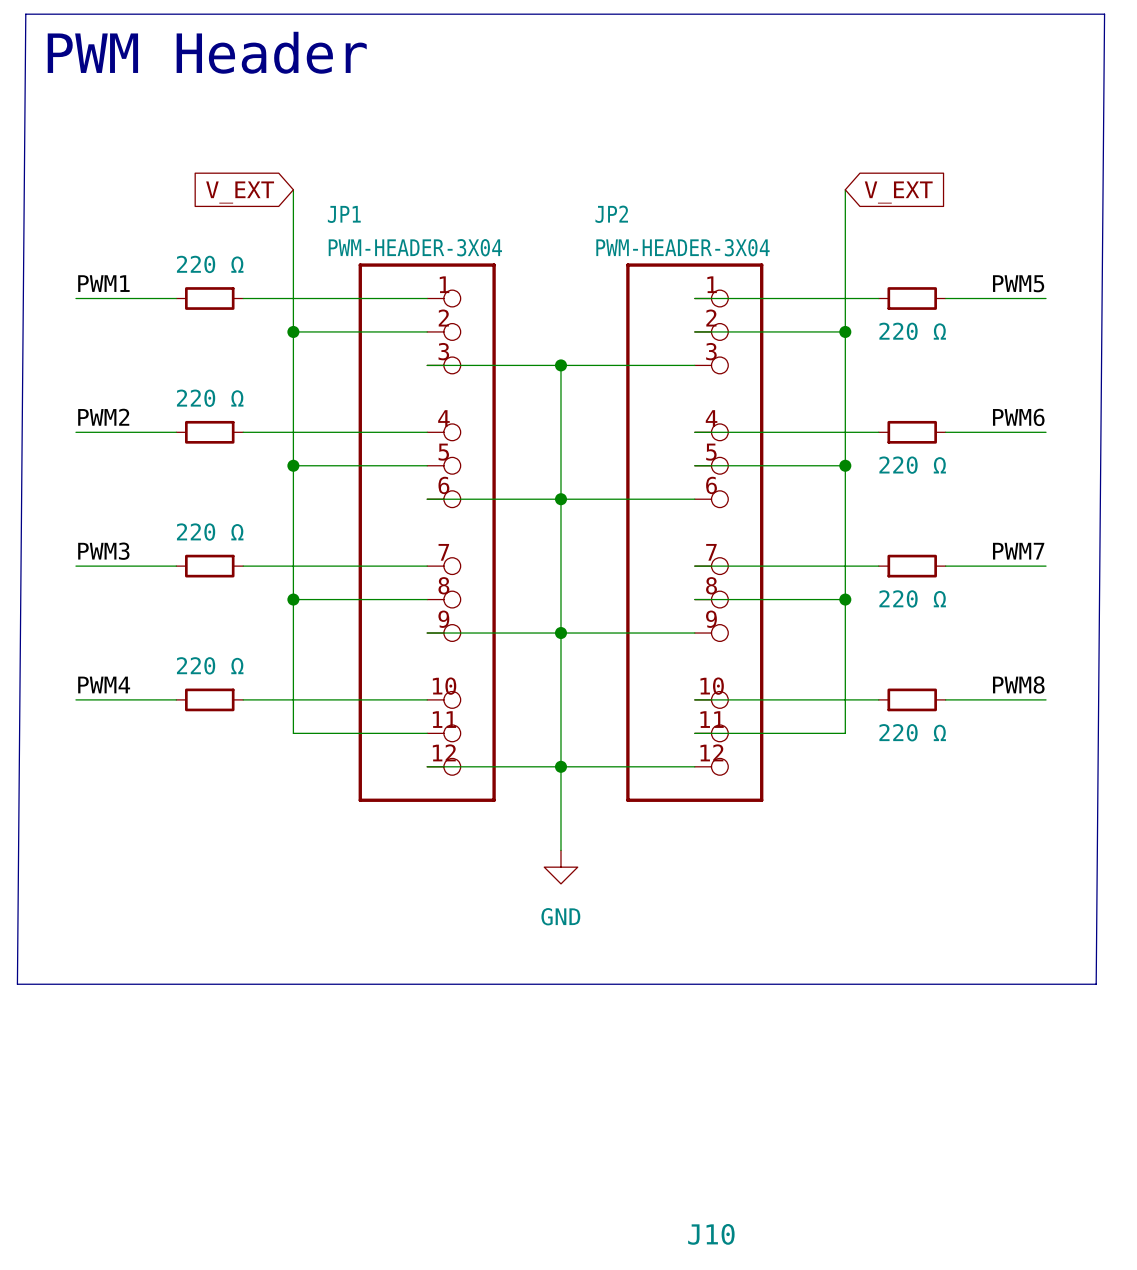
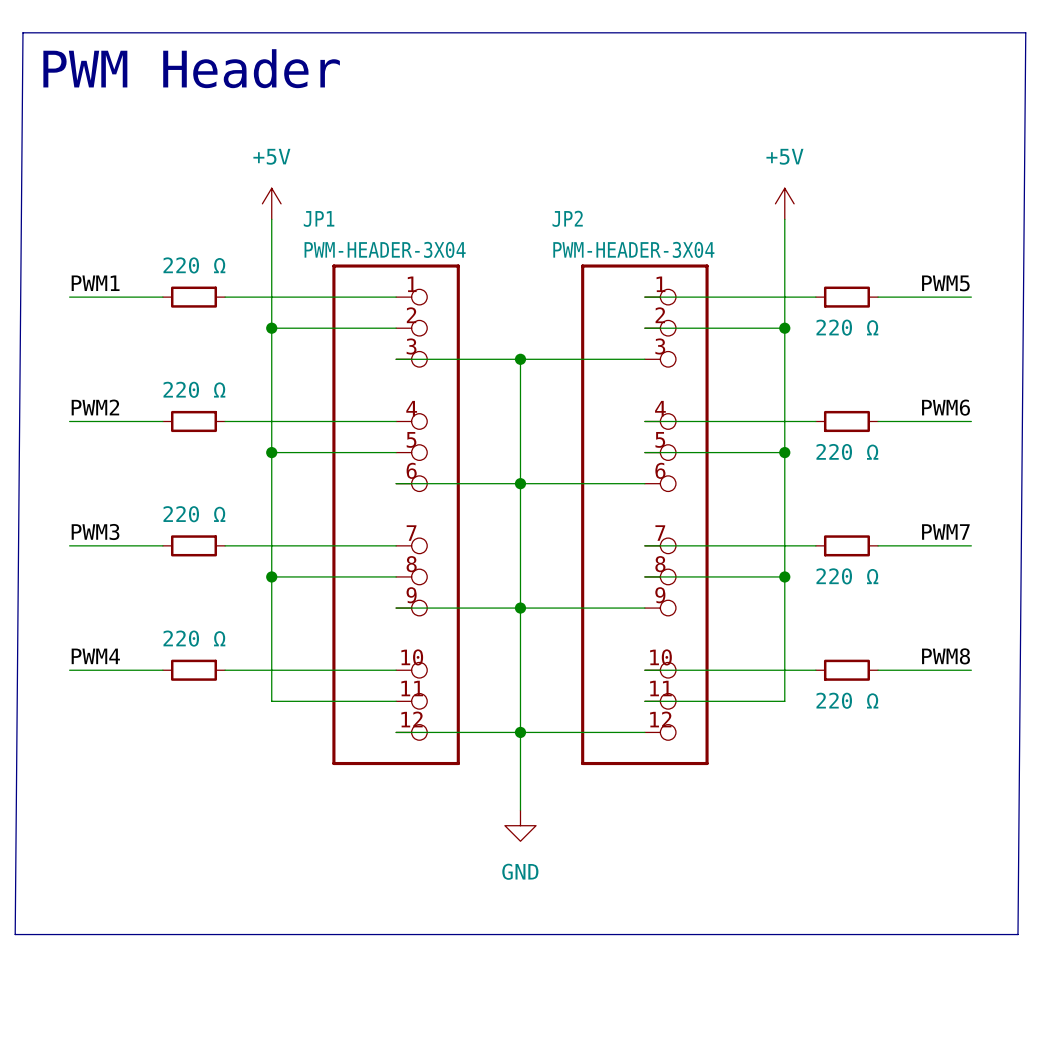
global label: V_EXT (240, 192) -> none
global label: V_EXT (898, 192) -> none
power symbol: none -> +5V (271, 203)
power symbol: none -> +5V (784, 203)

